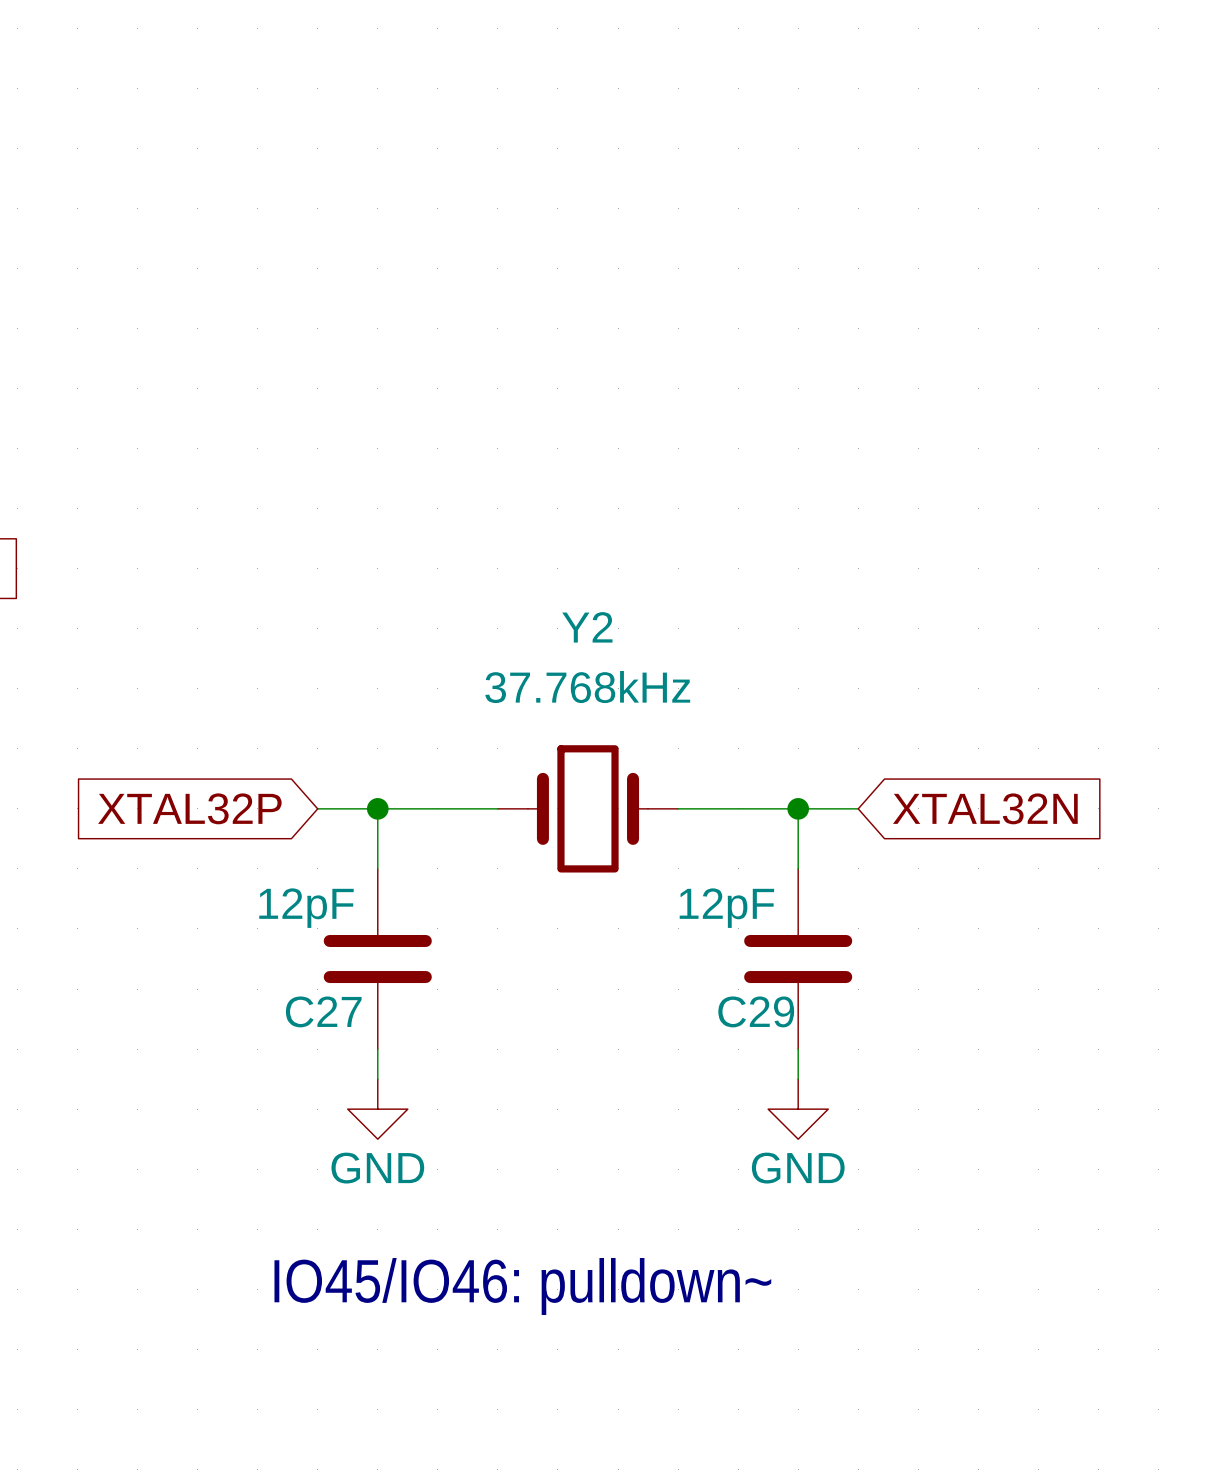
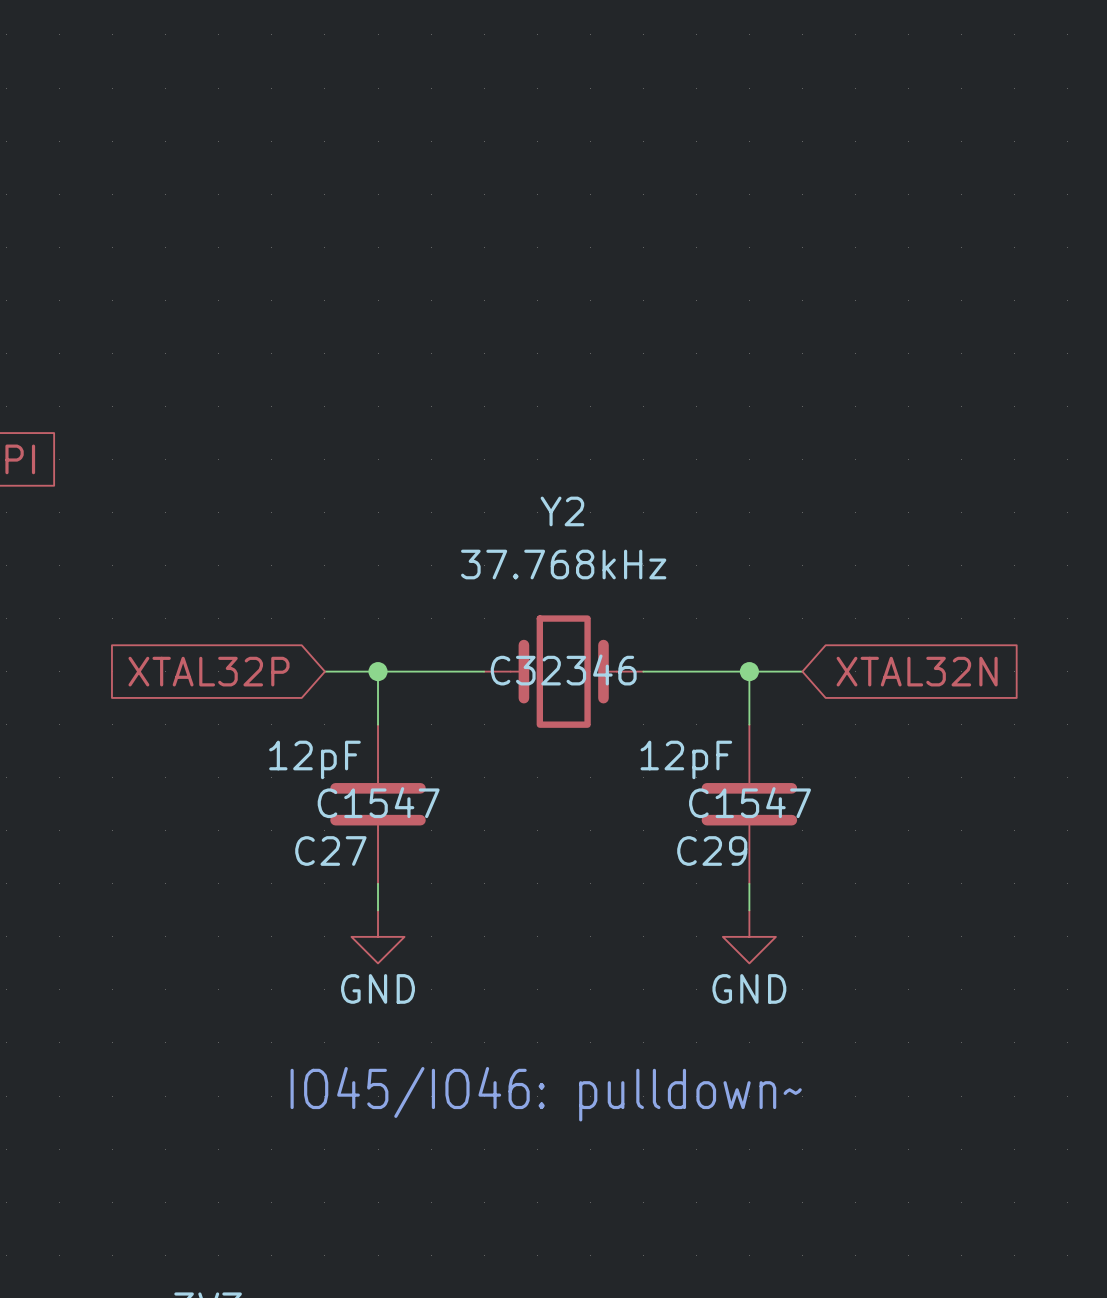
Y2 text: none -> C32346 (563, 669)
C27 text: none -> C1547 (378, 802)
C29 text: none -> C1547 (750, 802)

